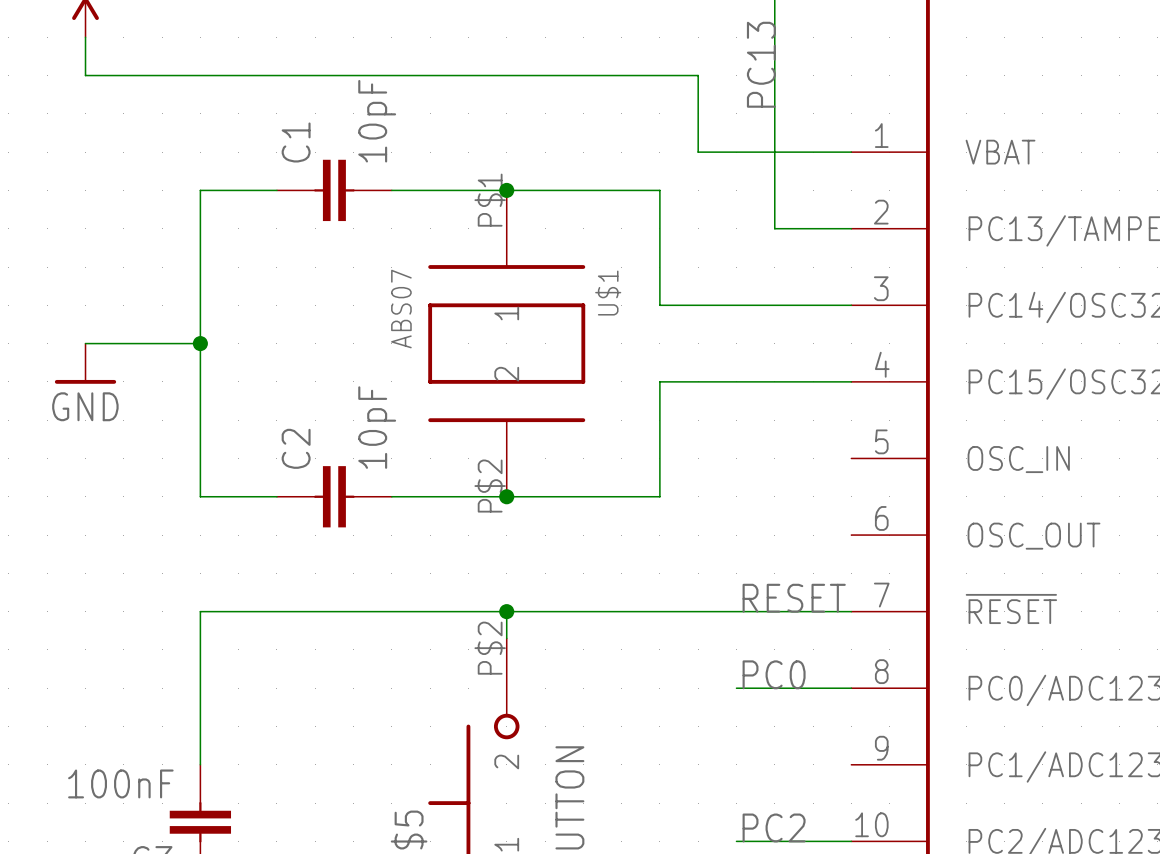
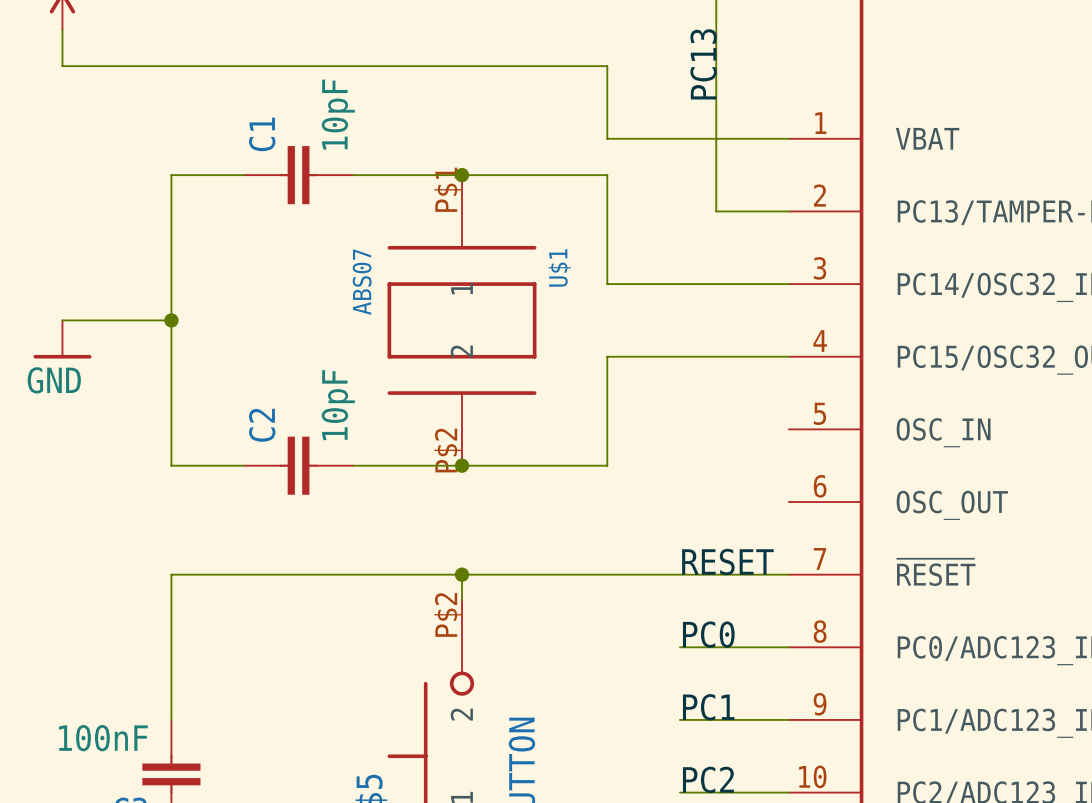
wire: (659, 75) (698, 75) (698, 152) -> (607, 66) (607, 138) (643, 138)
label: none -> PC1 (708, 707)
wire: none -> (679, 719) (788, 719)

